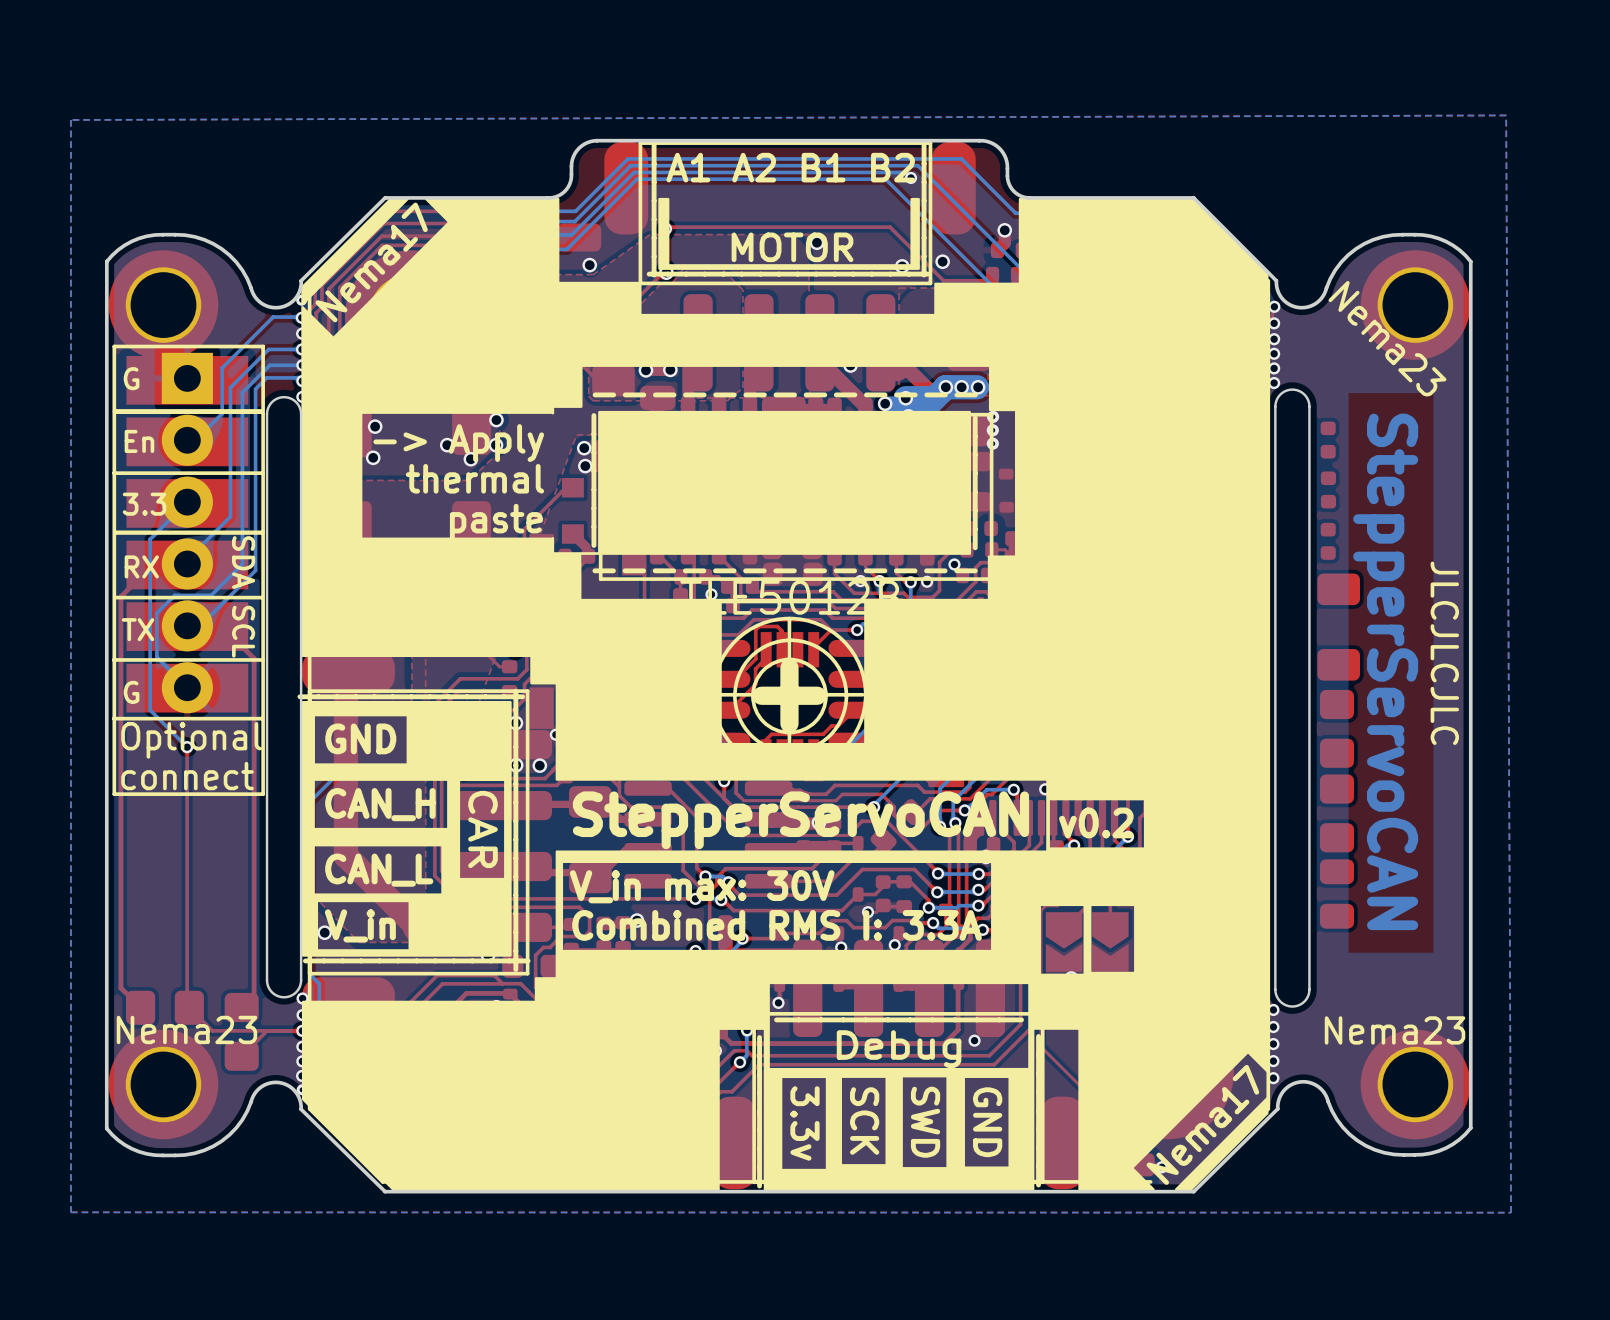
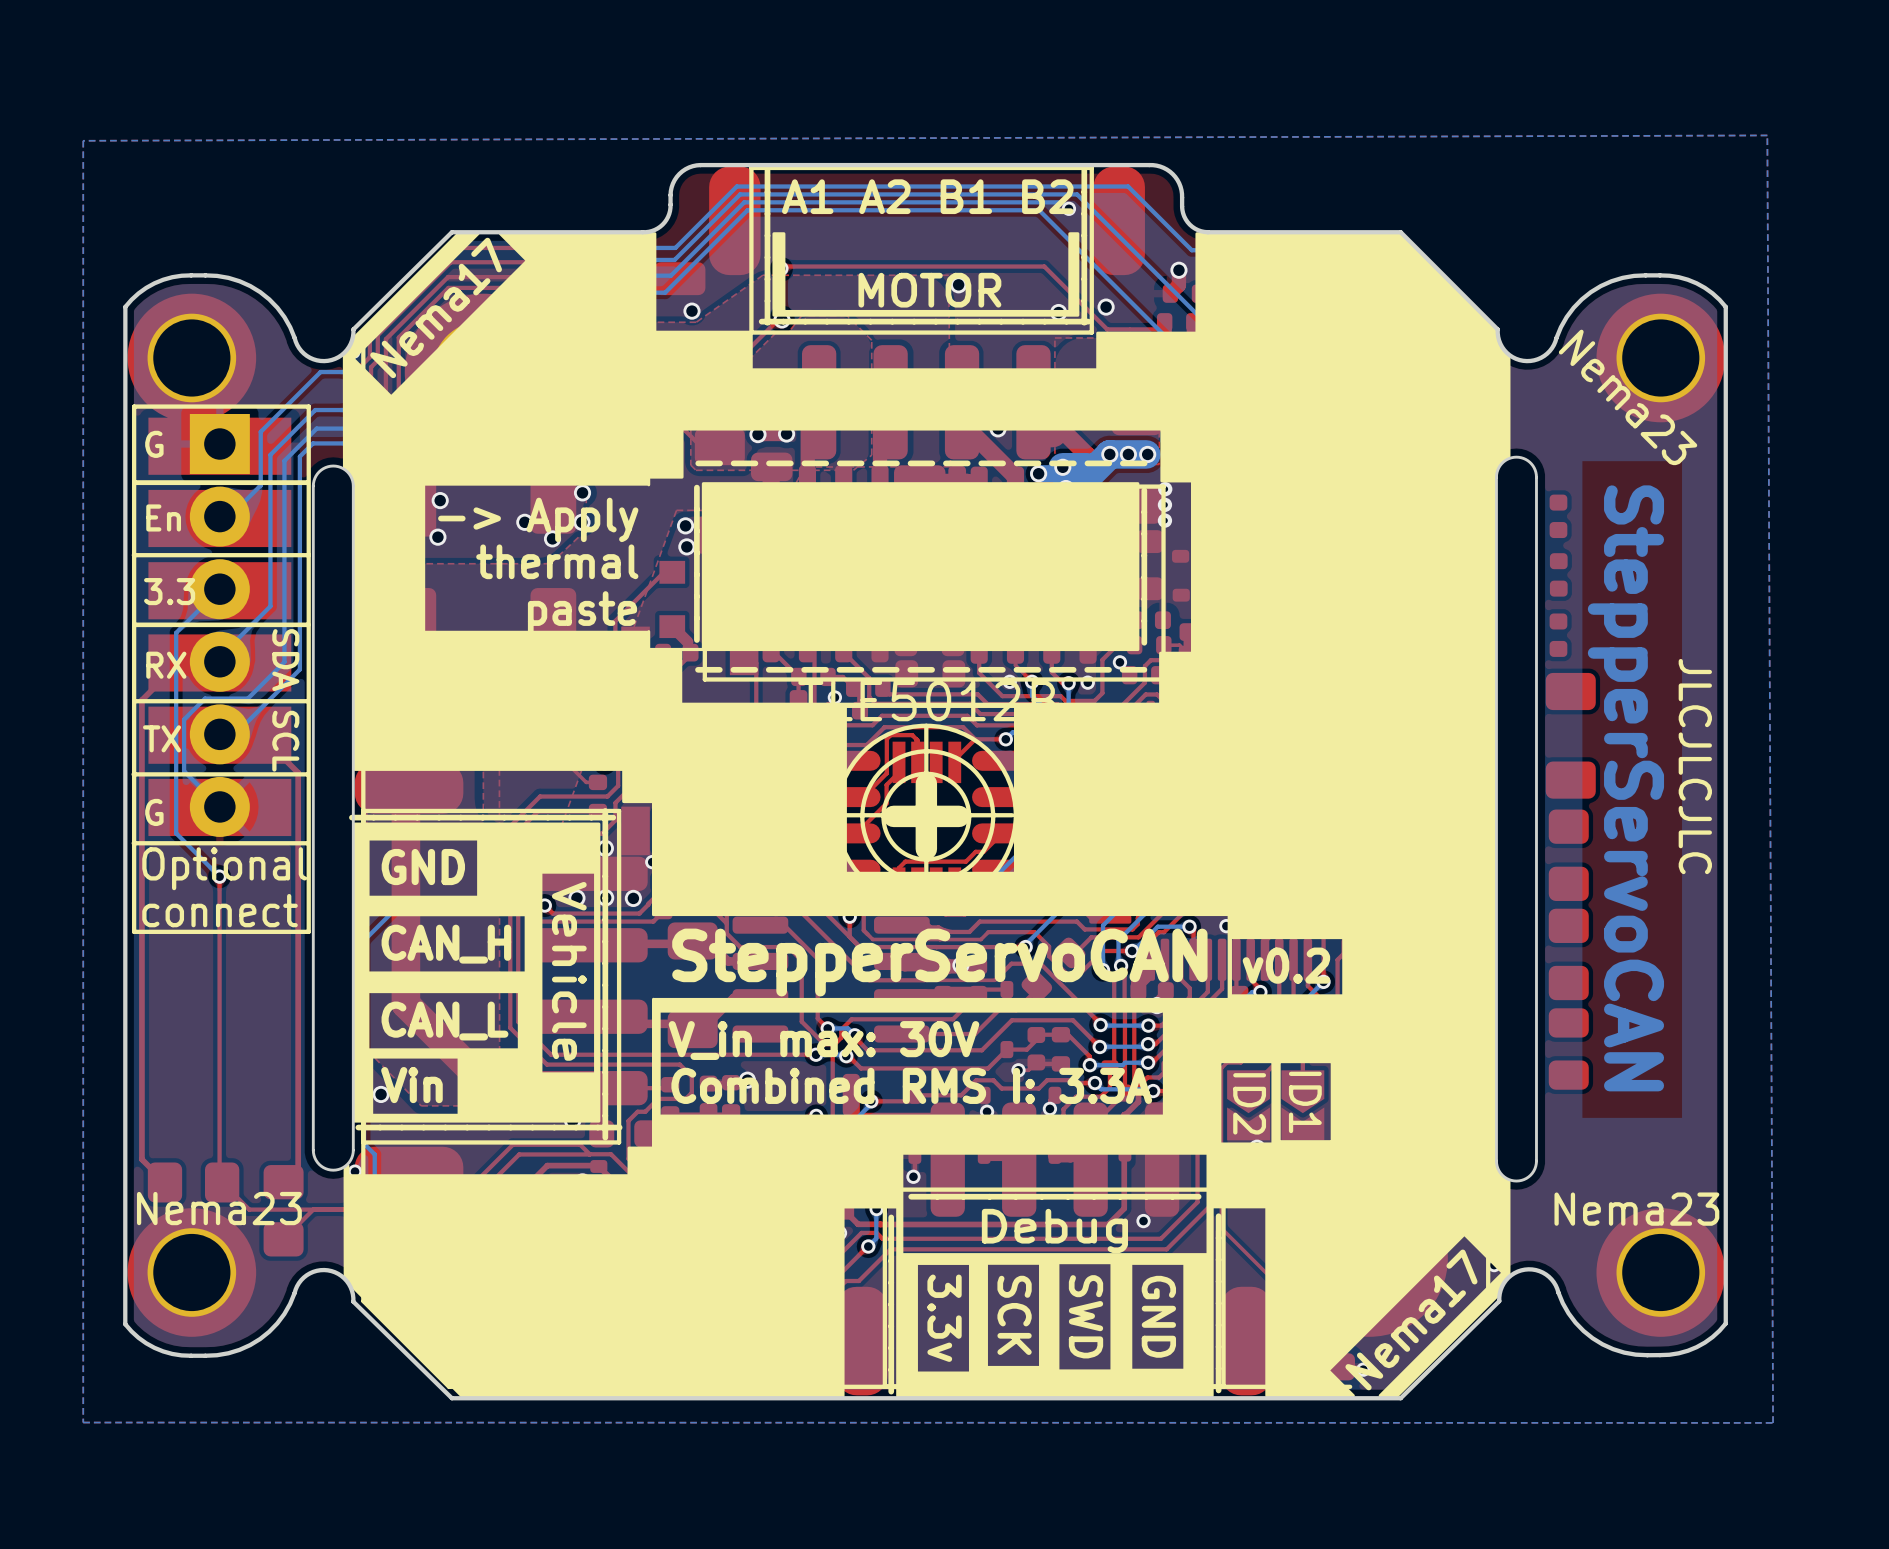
drawing shape: [301, 197, 1269, 1192] -> [342, 232, 1511, 1398]
drawing: [301, 197, 409, 306] -> none
drawing shape: [301, 701, 512, 957] -> [353, 822, 601, 1123]
text: CAR (483, 829) -> Vehicle (569, 971)
text: V_in (360, 925) -> Vin (411, 1085)
ID1 name: none -> ID1 (1305, 1102)
ID2 name: none -> ID2 (1249, 1103)
drawing: [1174, 1097, 1269, 1191] -> none

